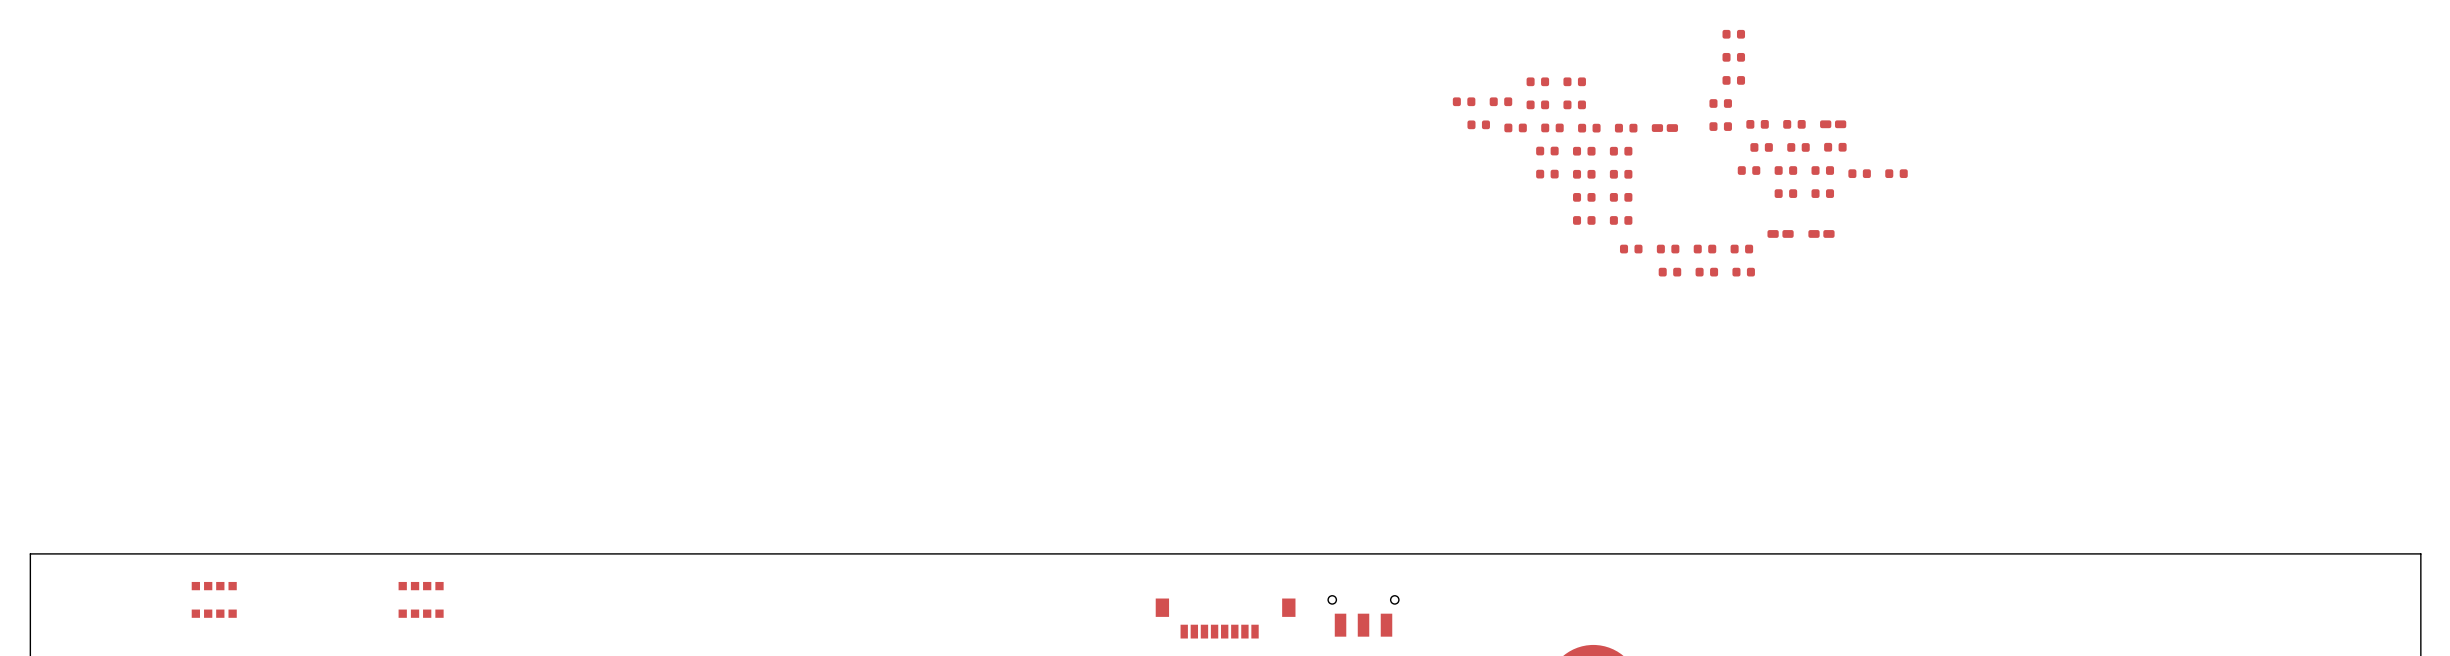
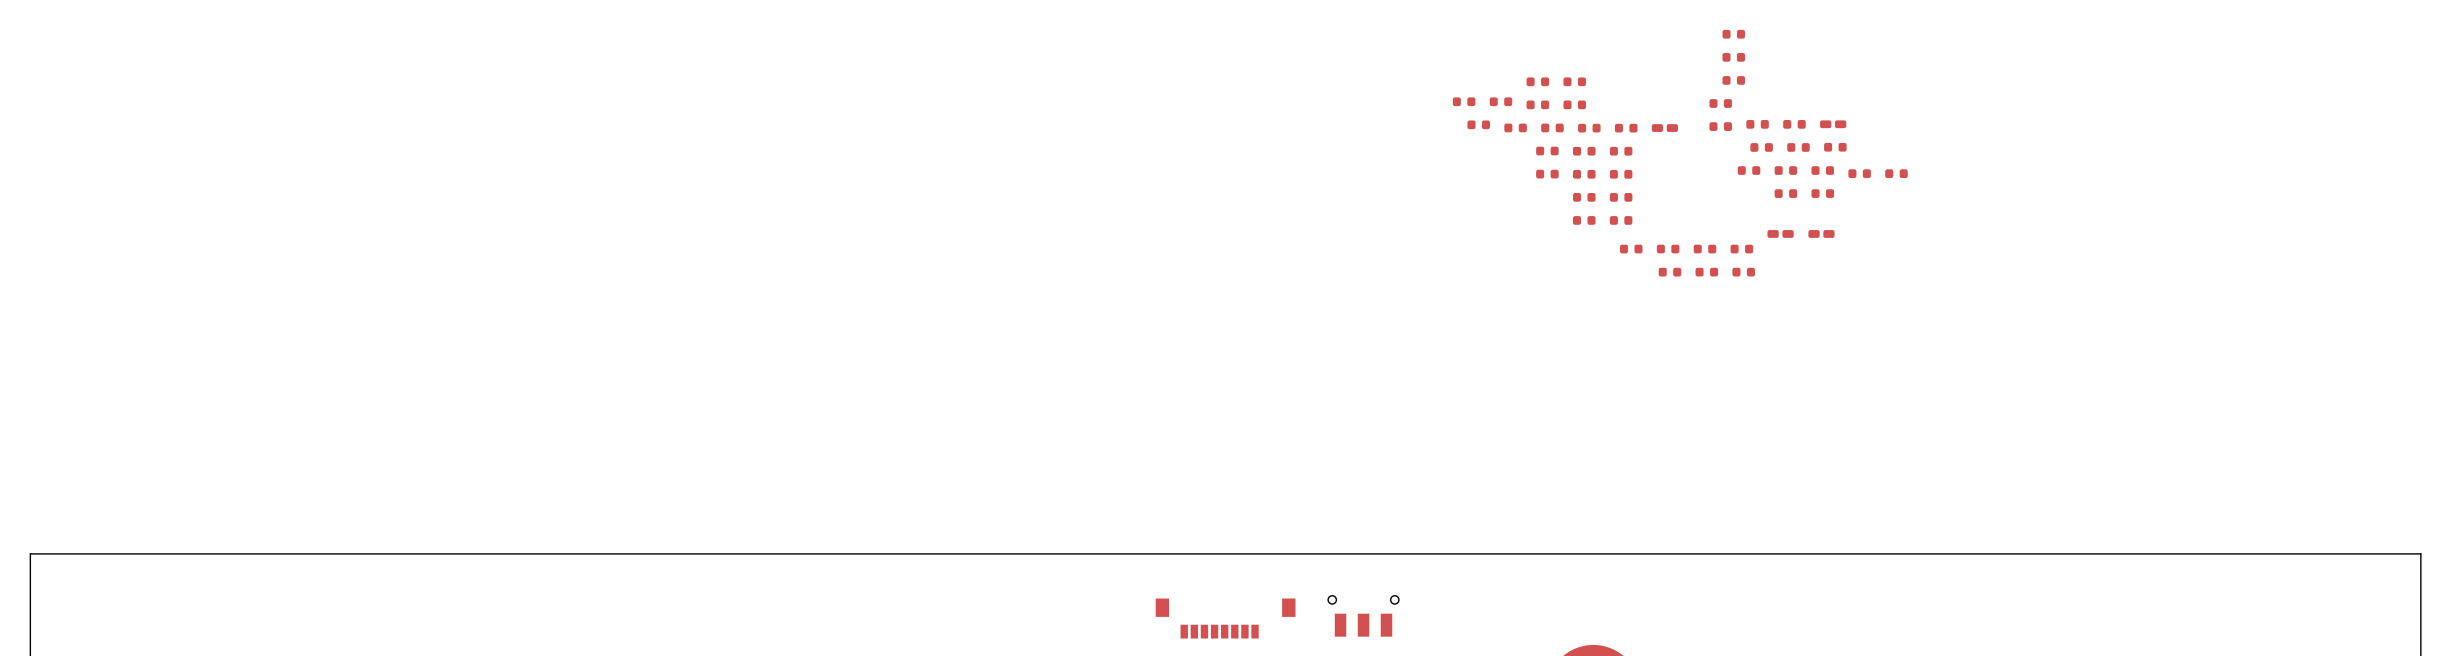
part: (214, 599) -> none
part: (421, 599) -> none

